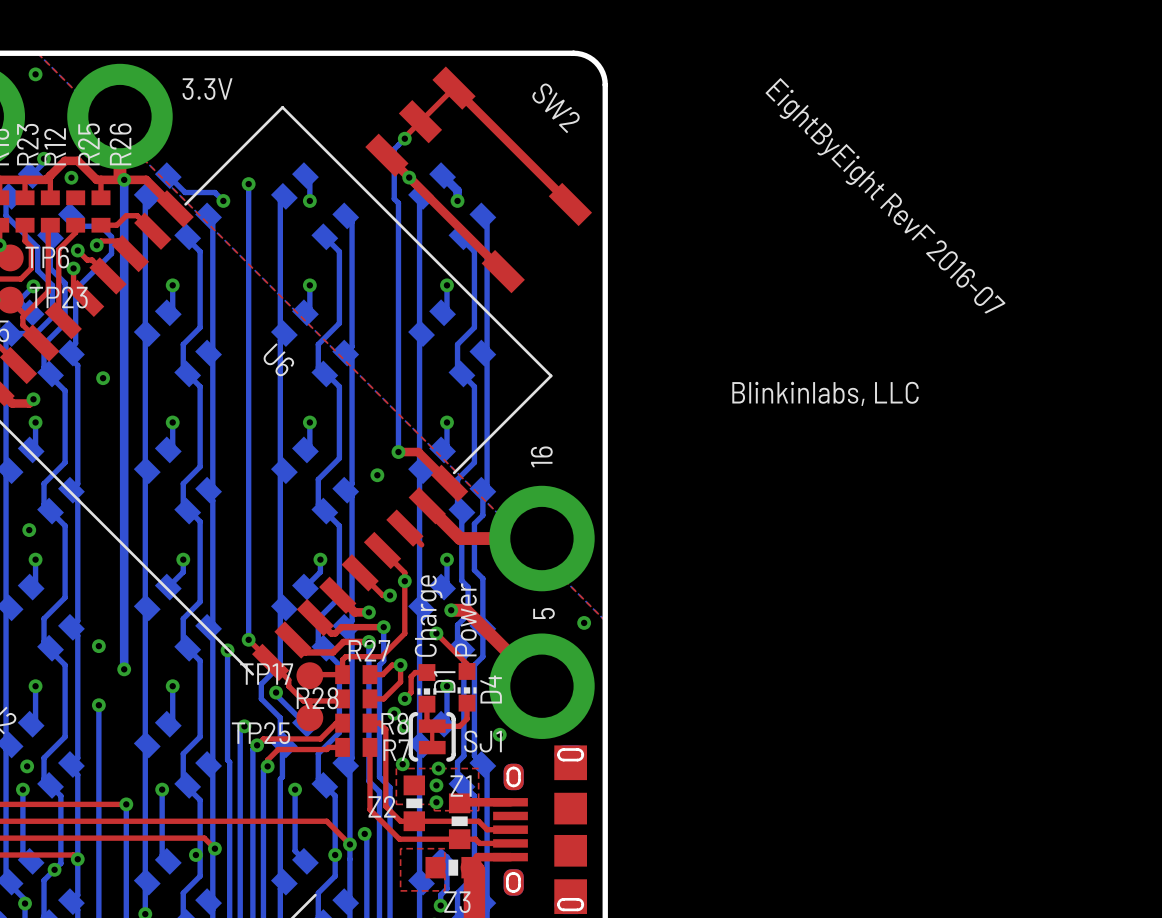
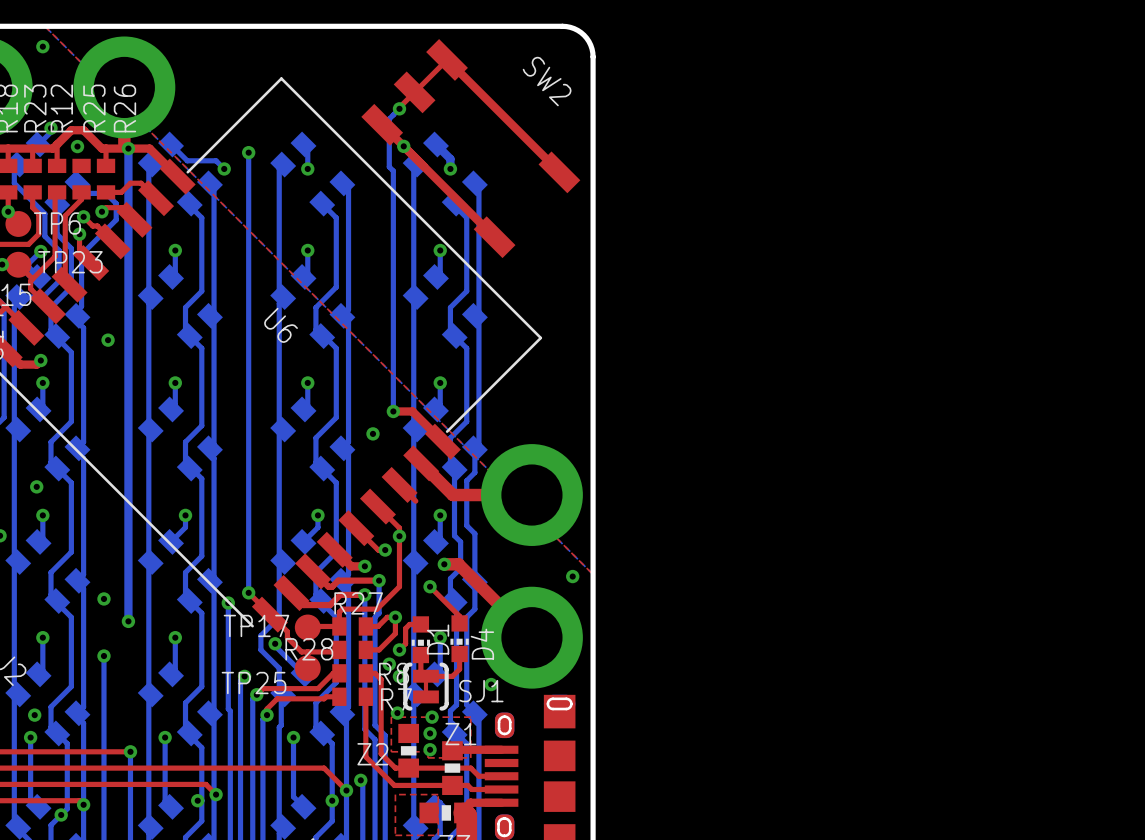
text: 3.3V (207, 89) -> none
text: EightByEight RevF 2016-07 (885, 195) -> none
text: Blinkinlabs, LLC (825, 393) -> none
text: 16 (541, 456) -> none
text: 5 (543, 613) -> none
text: Charge (428, 616) -> none
text: Power (465, 619) -> none

